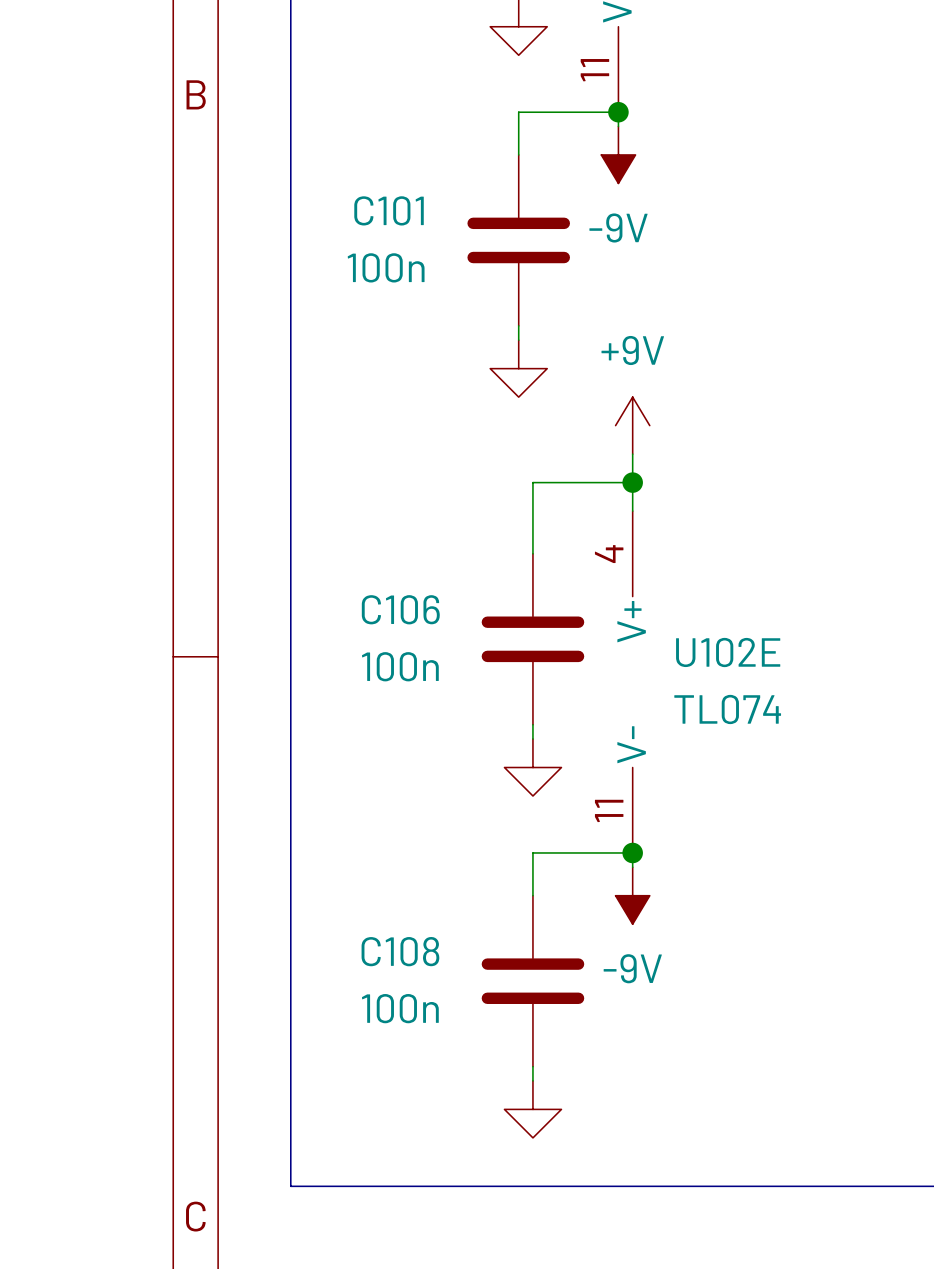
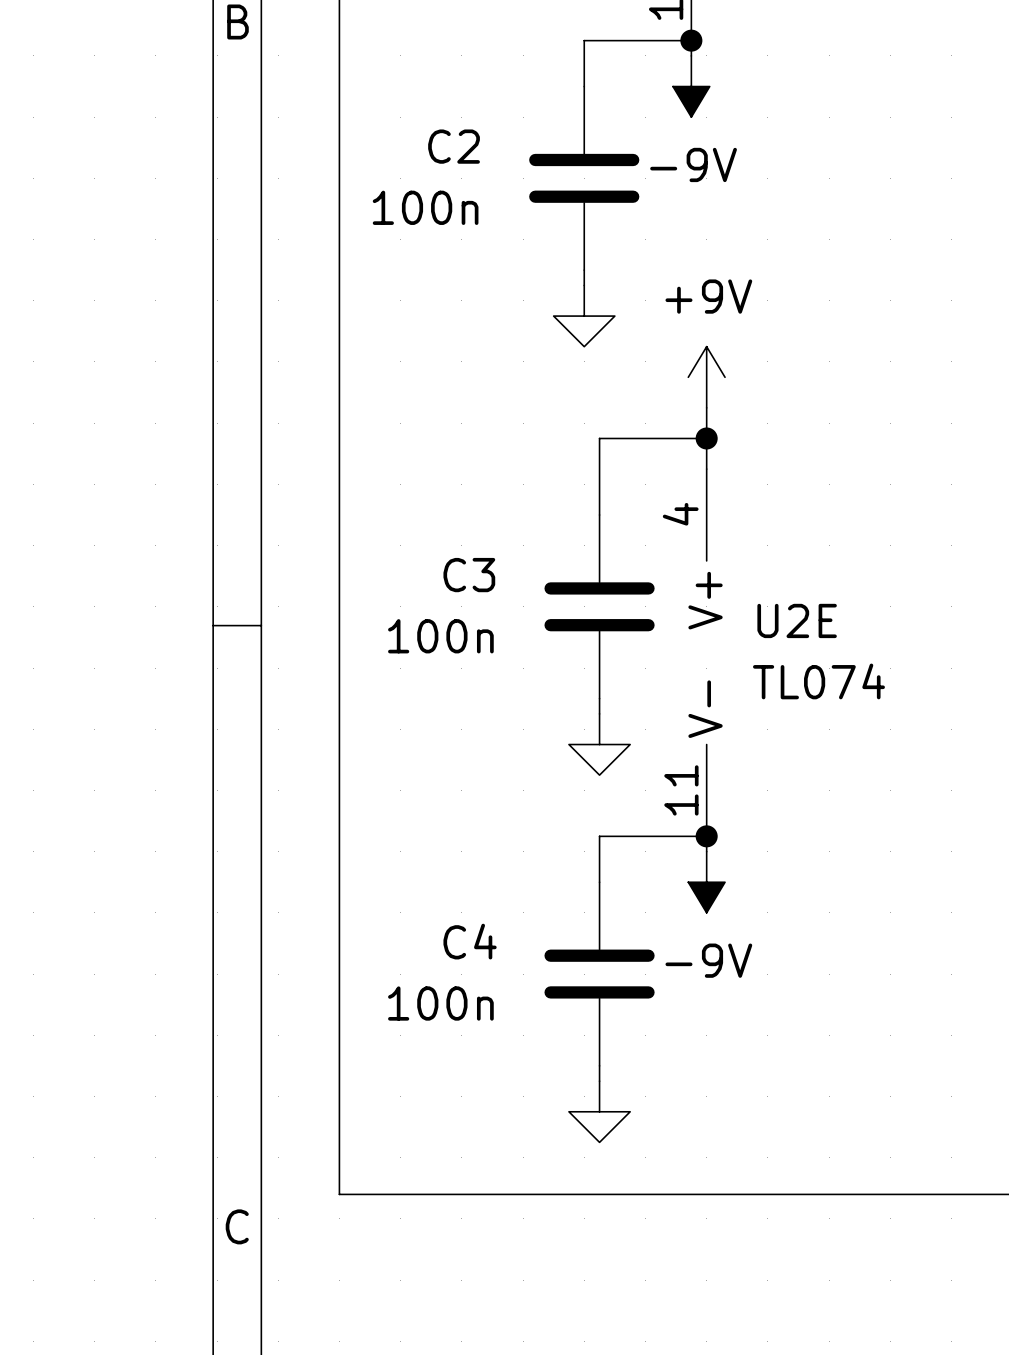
C101 name: C101 (389, 210) -> C2 (454, 146)
C106 name: C106 (400, 609) -> C3 (469, 575)
U102E name: U102E (728, 652) -> U2E (797, 620)
C108 name: C108 (400, 951) -> C4 (470, 941)

